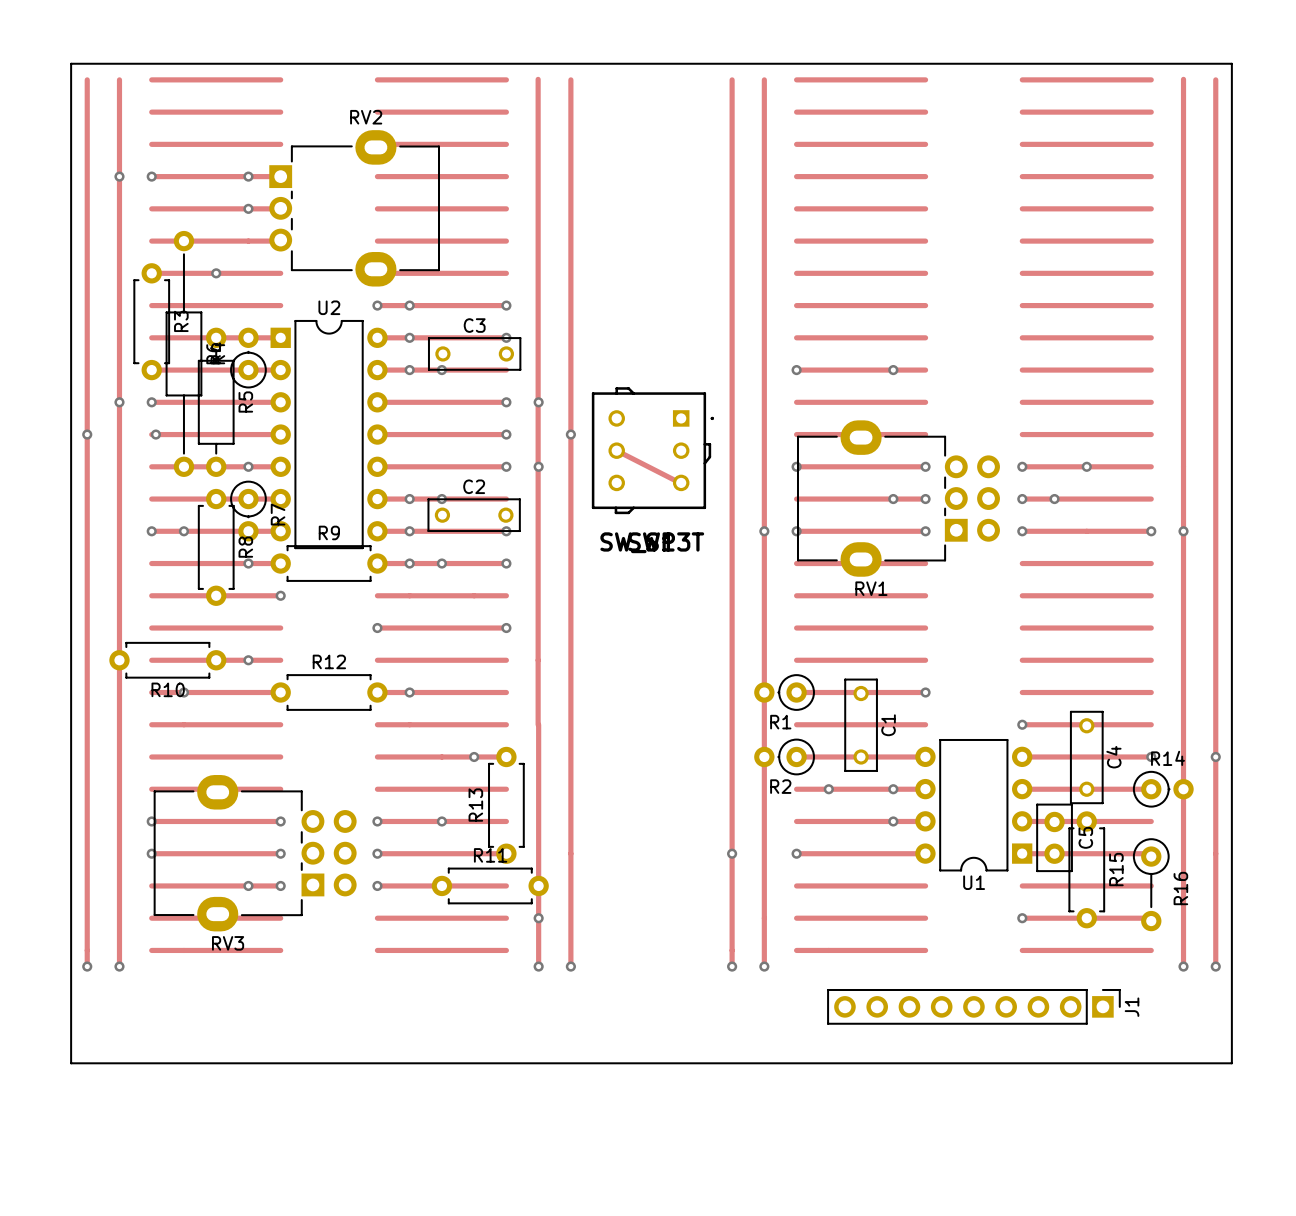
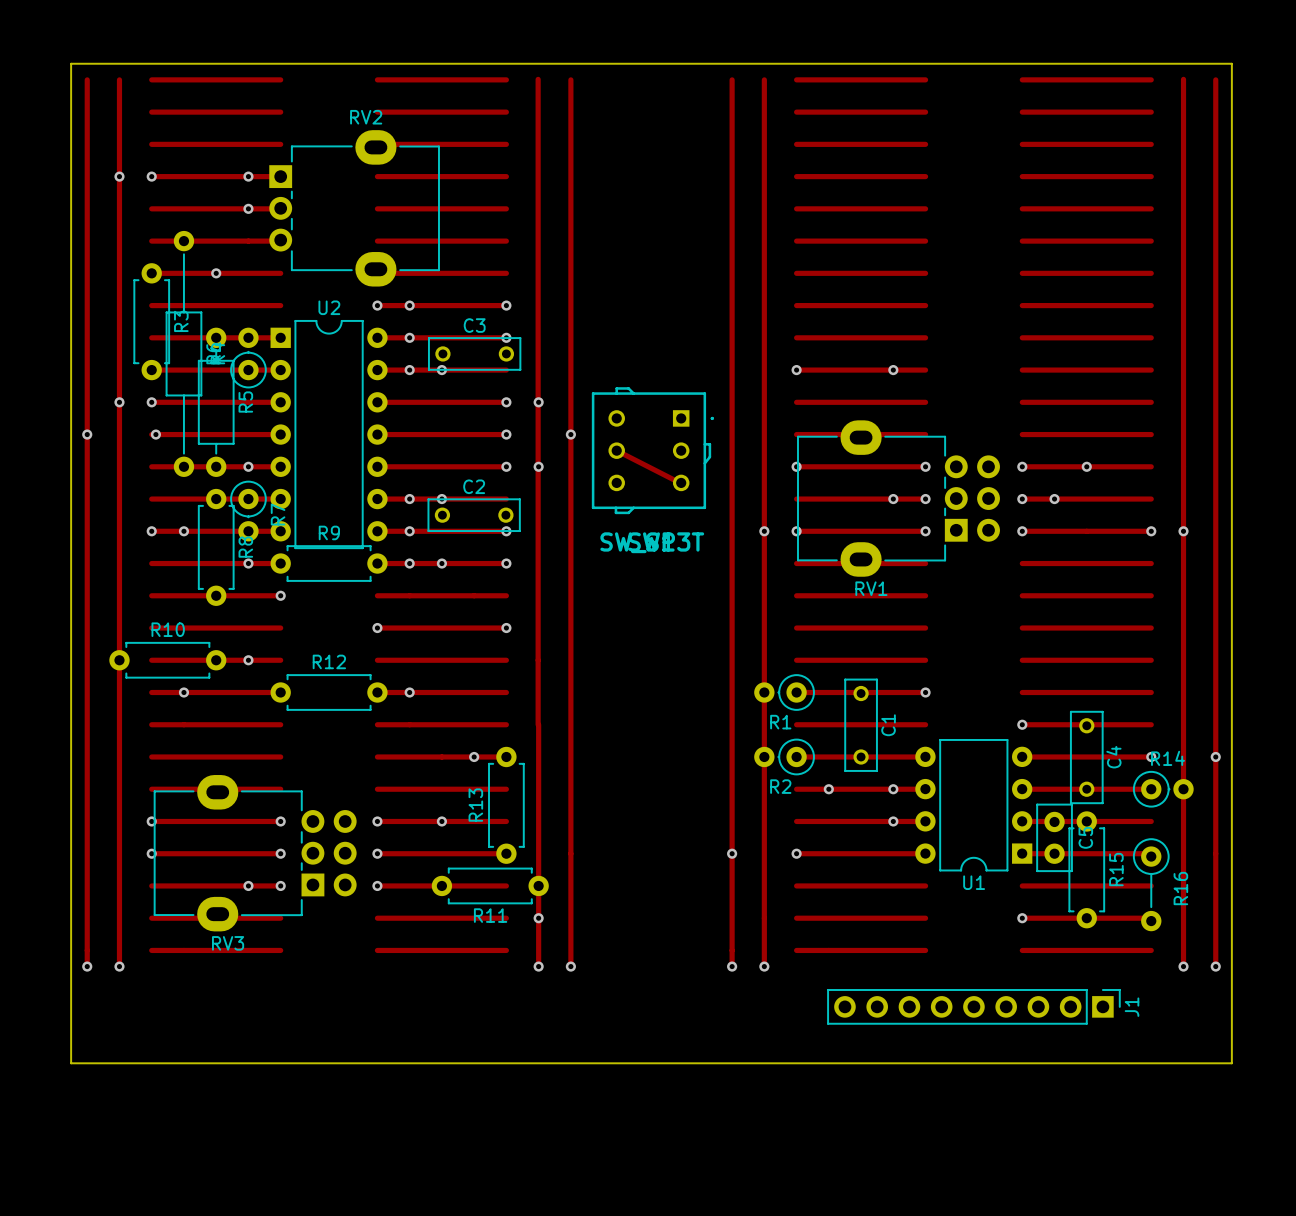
R10 name position: R10 (168, 689) -> R10 (168, 629)
R11 name position: R11 (490, 855) -> R11 (490, 915)

